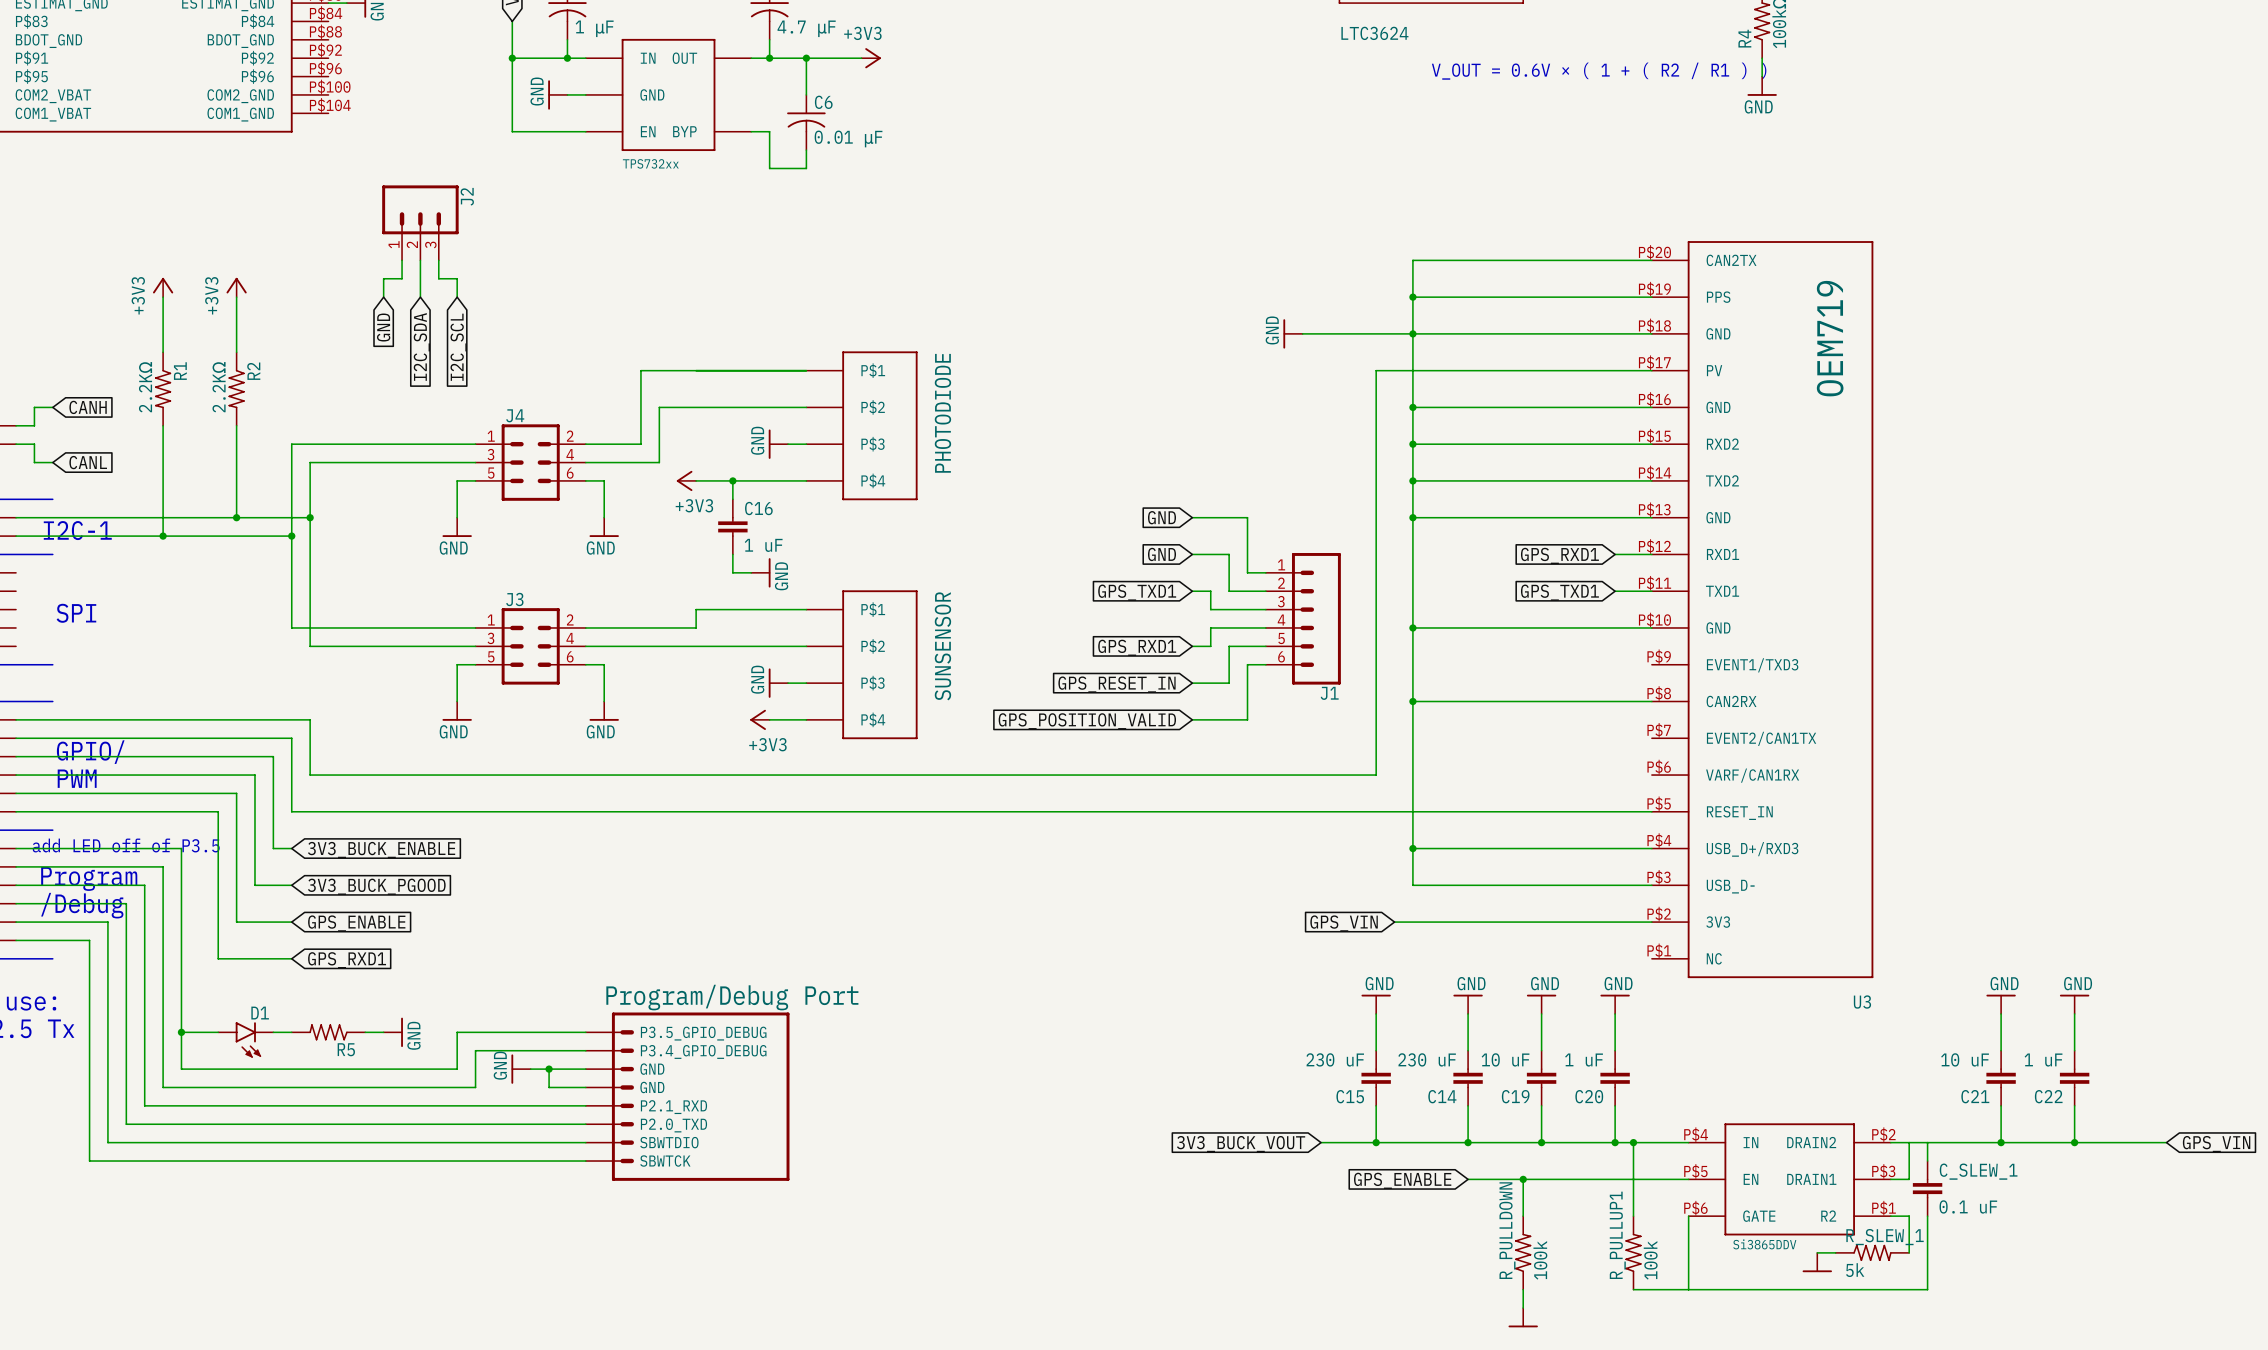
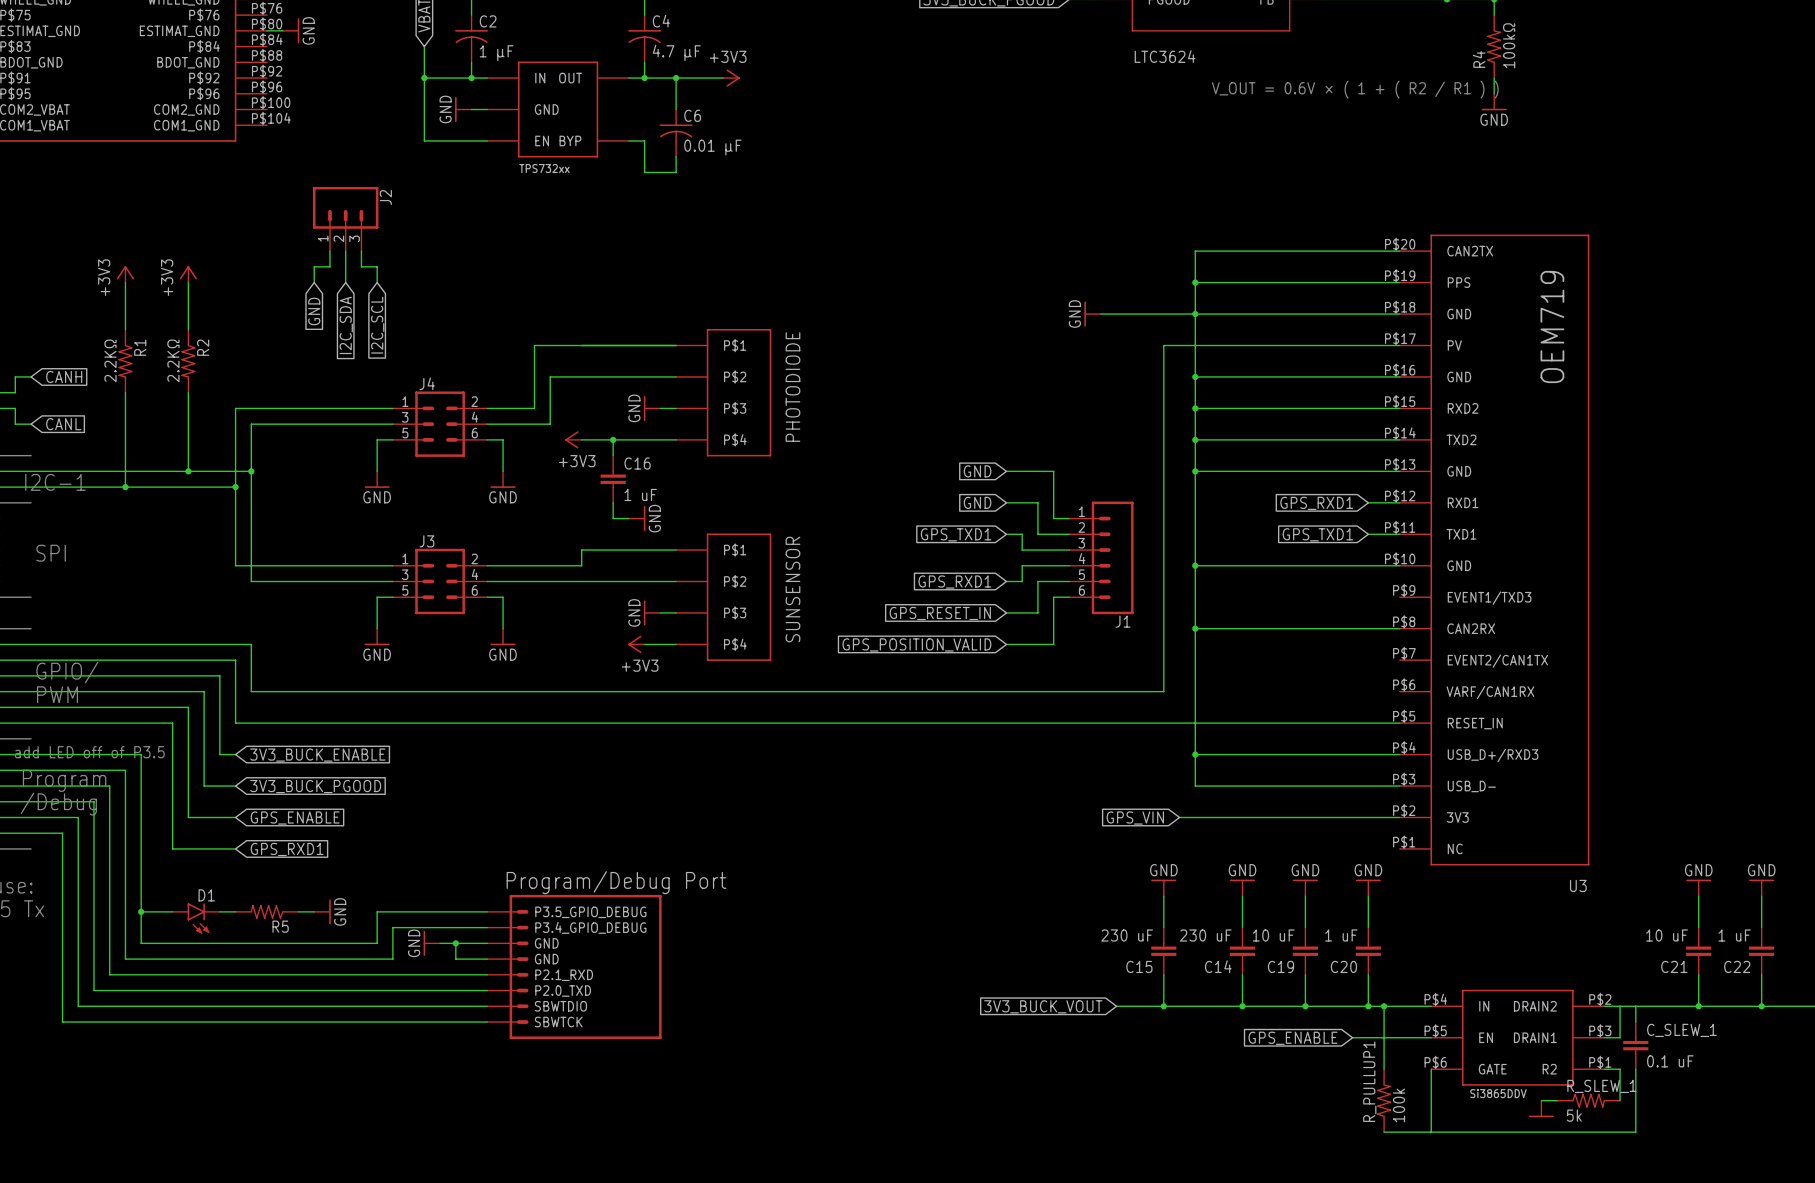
wire: (1468, 1179) (1596, 1179) -> none
wire: (1523, 1179) (1523, 1216) -> none
junction: (1523, 1179) -> none
global label position: GPS_ENABLE (1402, 1180) -> GPS_ENABLE (1293, 1038)
R_PULLDOWN: 100k (1523, 1252) -> none
wire: (1523, 1289) (1523, 1308) -> none
power symbol: (1523, 1317) -> none

